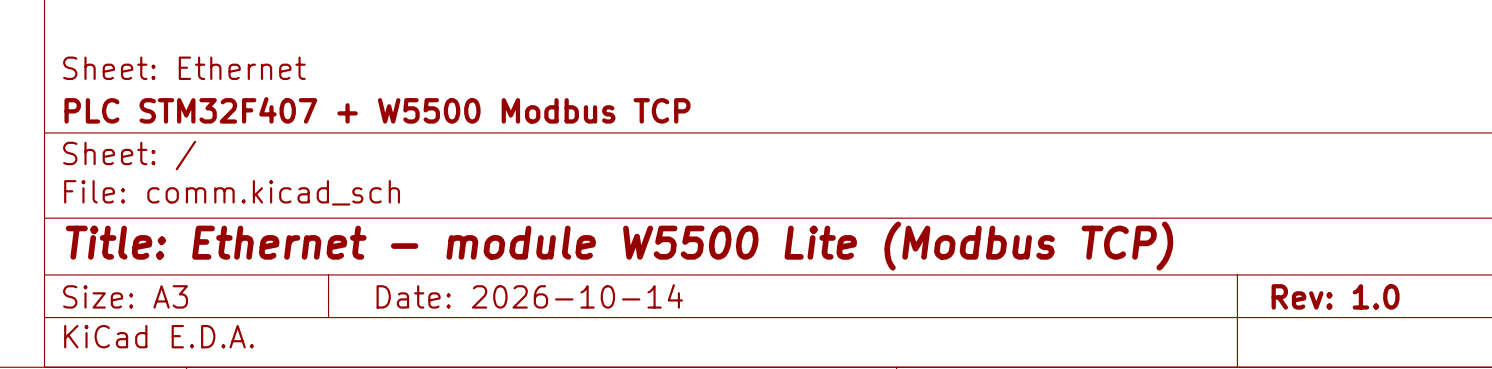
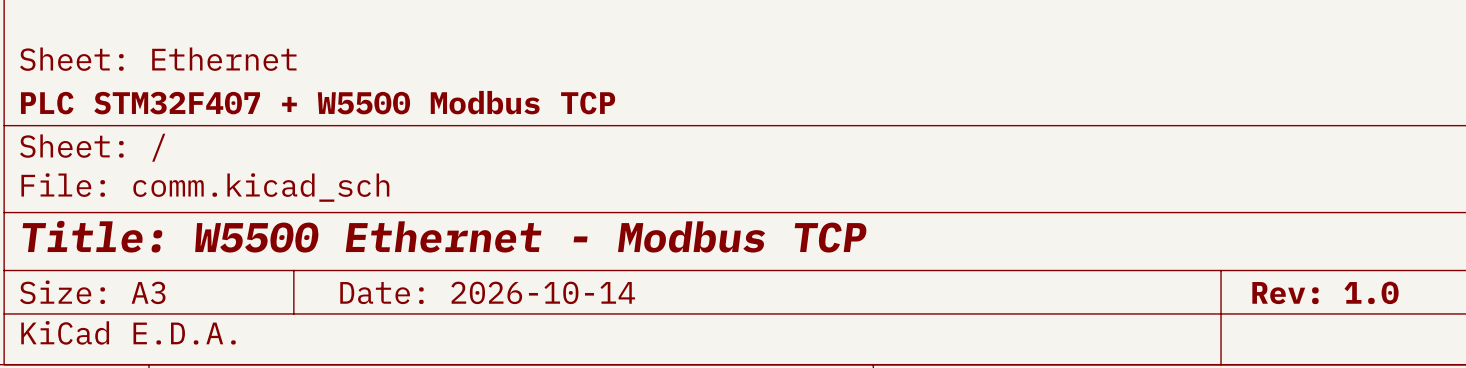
title block: Title: Ethernet - module W5500 Lite (Modbus TCP) (619, 246) -> Title: W5500 Ethernet - Modbus TCP (444, 236)

